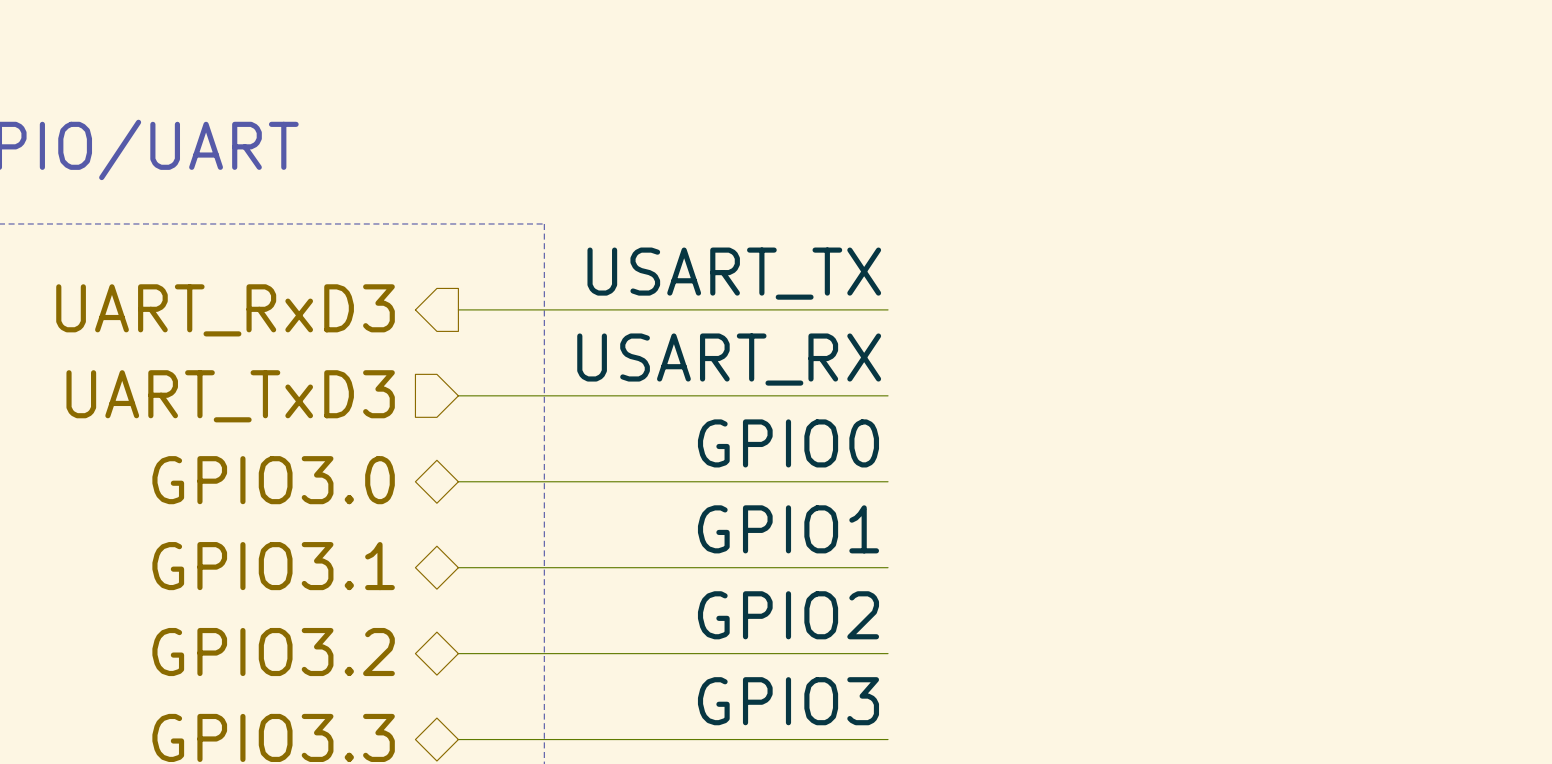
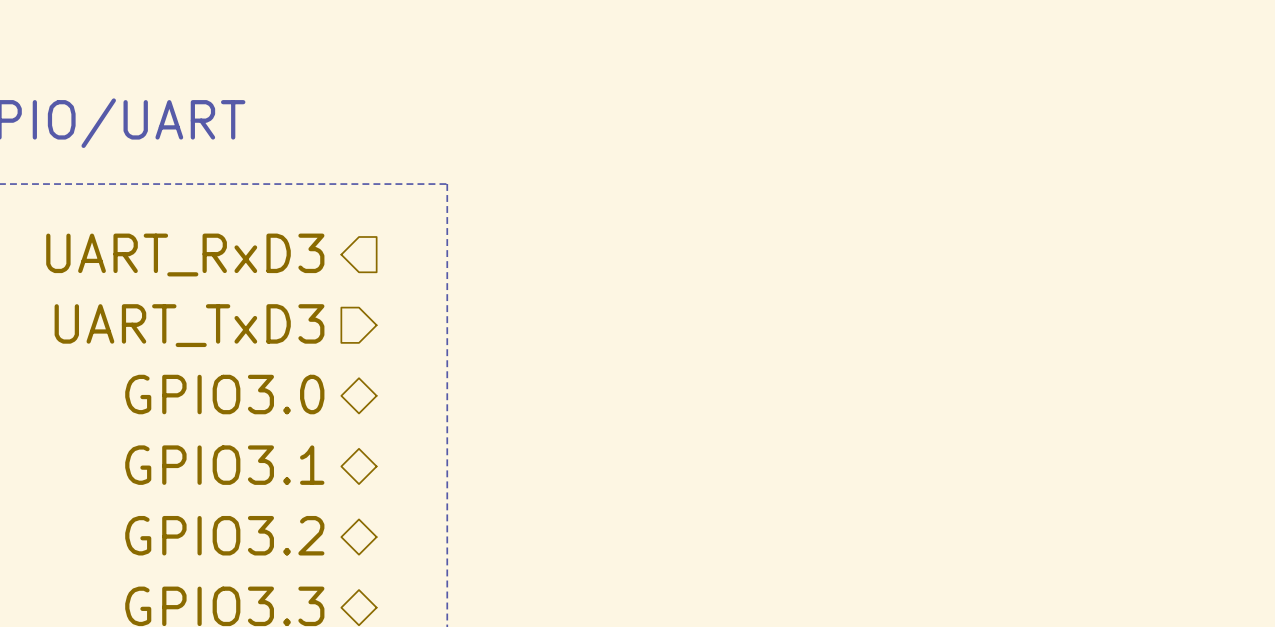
label: USART_TX (734, 273) -> none
wire: (458, 309) (888, 309) -> none
label: USART_RX (729, 359) -> none
wire: (458, 395) (888, 395) -> none
label: GPIO0 (788, 443) -> none
wire: (458, 481) (888, 481) -> none
label: GPIO1 (788, 529) -> none
wire: (458, 567) (888, 567) -> none
label: GPIO2 (788, 615) -> none
wire: (458, 653) (888, 653) -> none
label: GPIO3 (788, 701) -> none
wire: (458, 739) (888, 739) -> none

